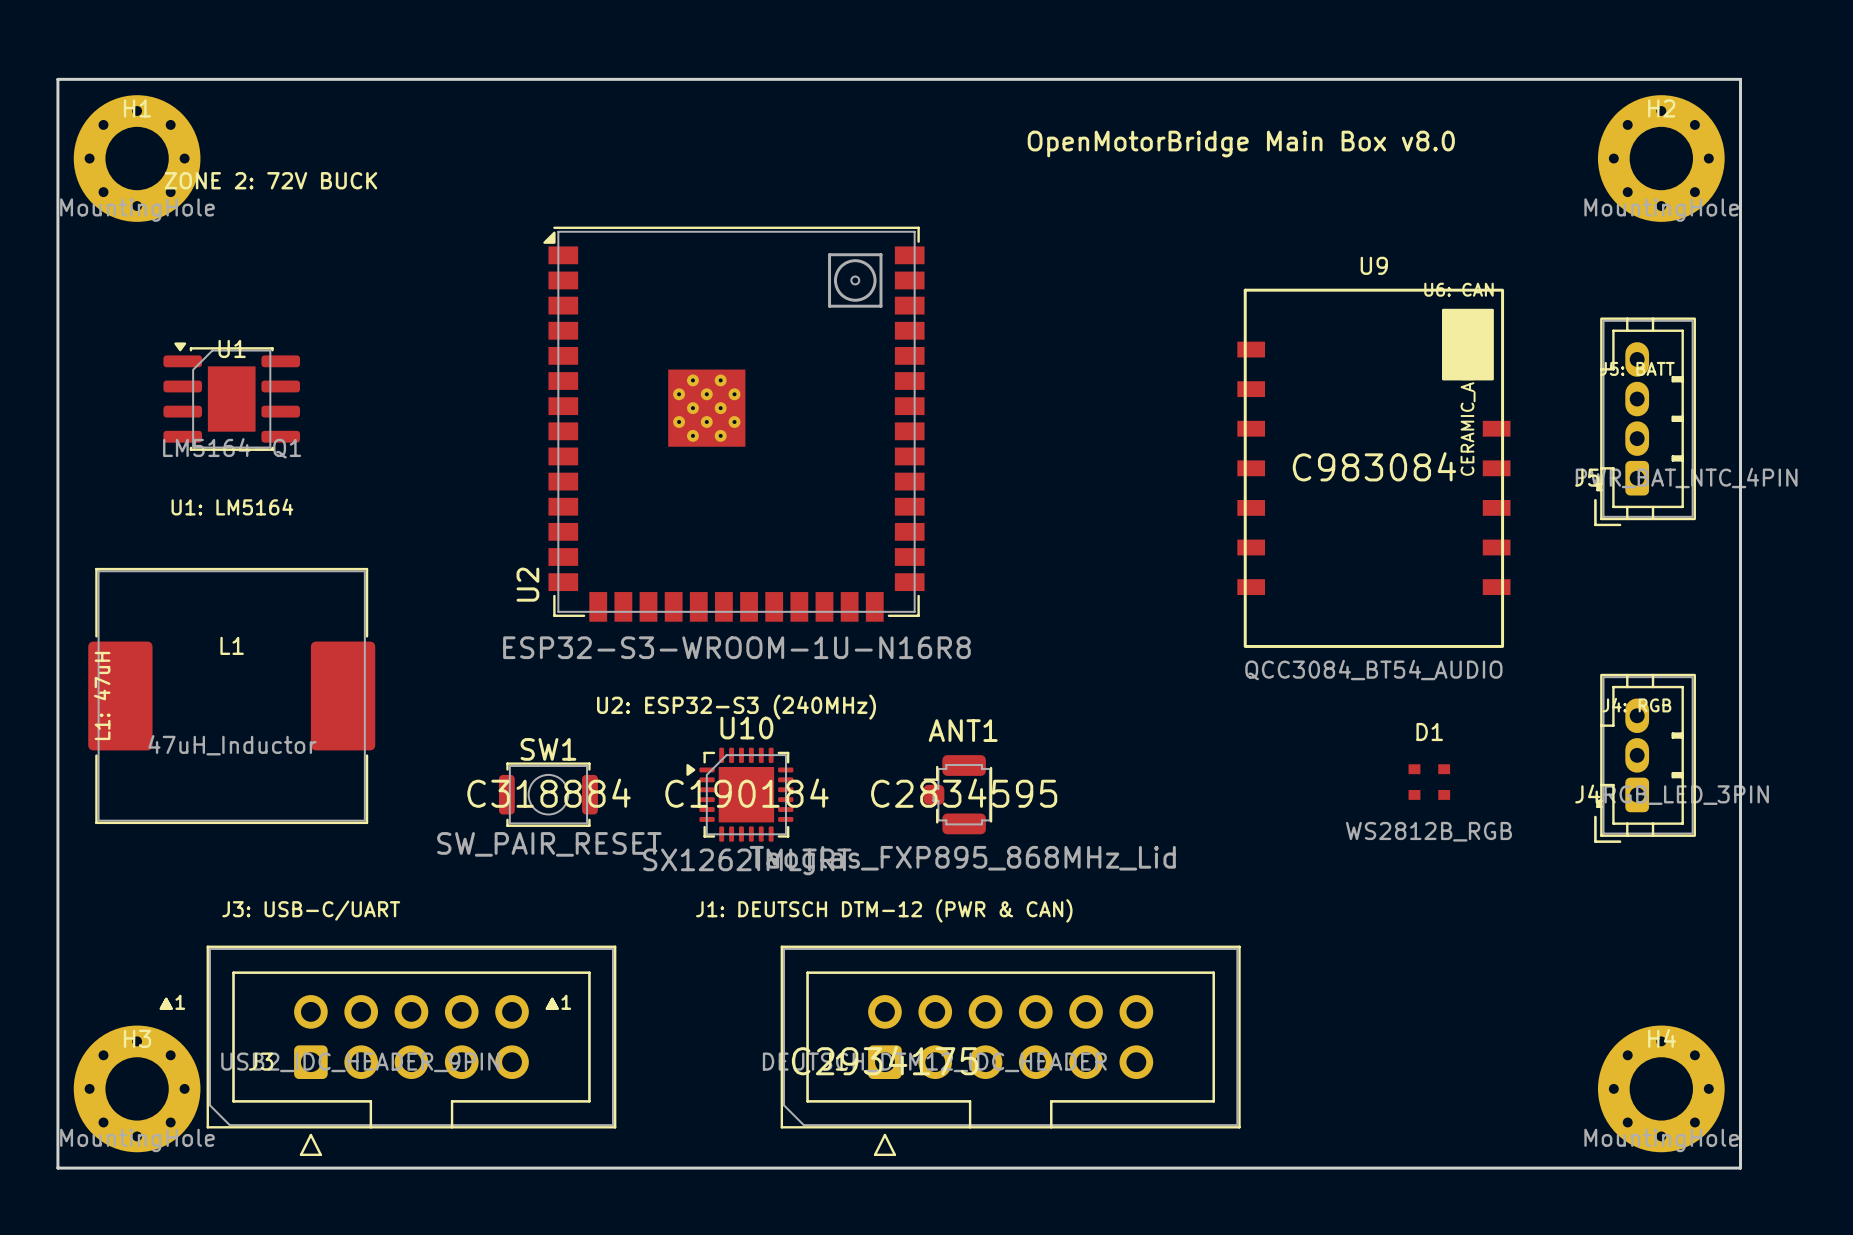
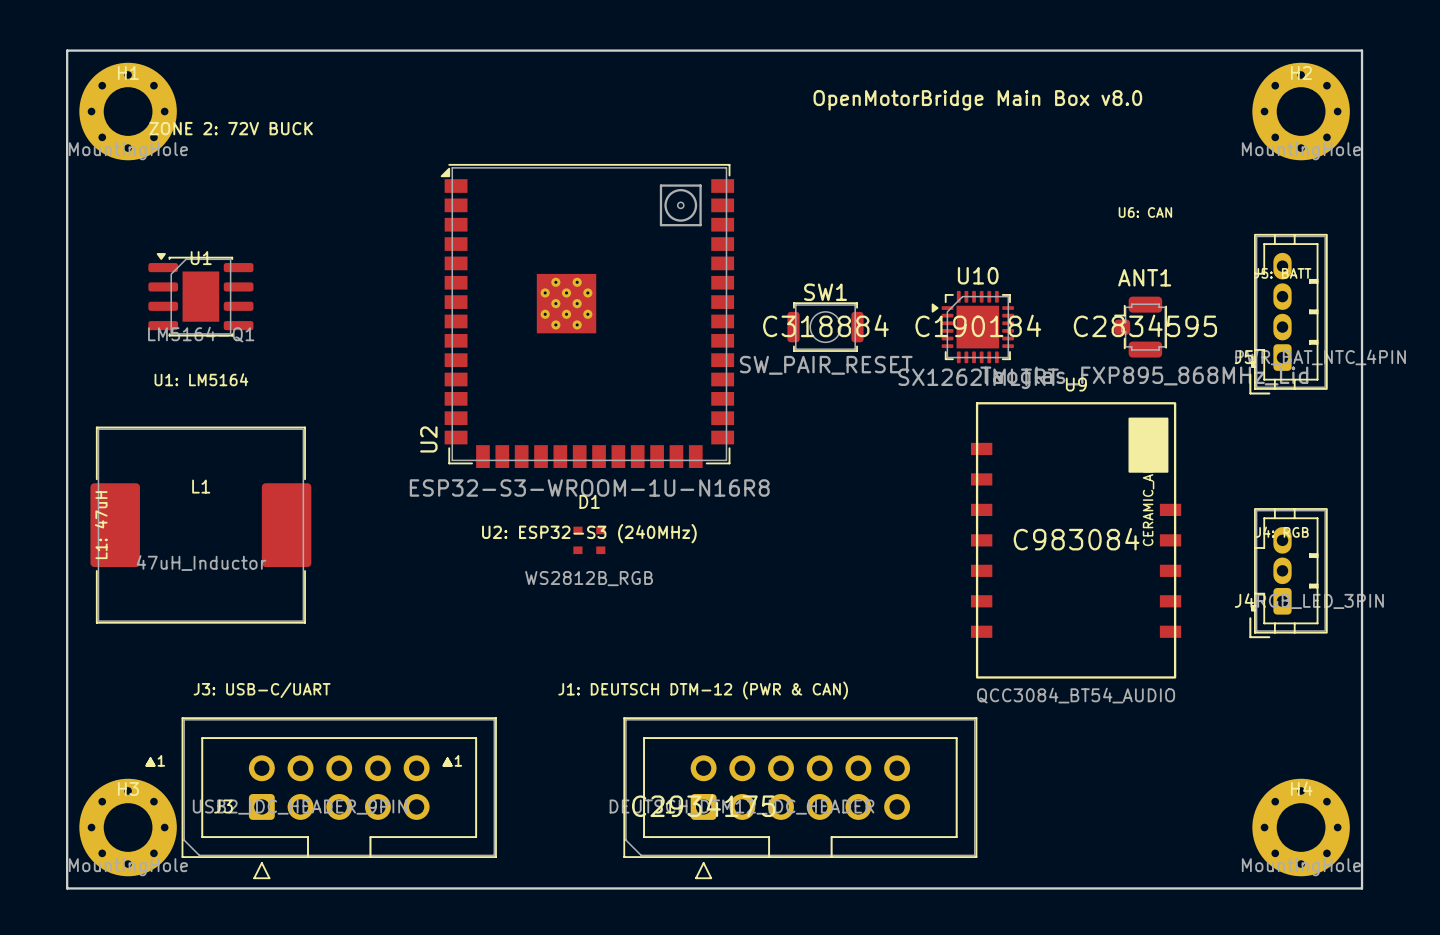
U9 position: (1373, 468) -> (1076, 540)
D1 position: (1429, 782) -> (589, 540)
SW1 position: (548, 794) -> (825, 327)
U10 position: (739, 794) -> (972, 327)
ANT1 position: (957, 794) -> (1140, 327)

